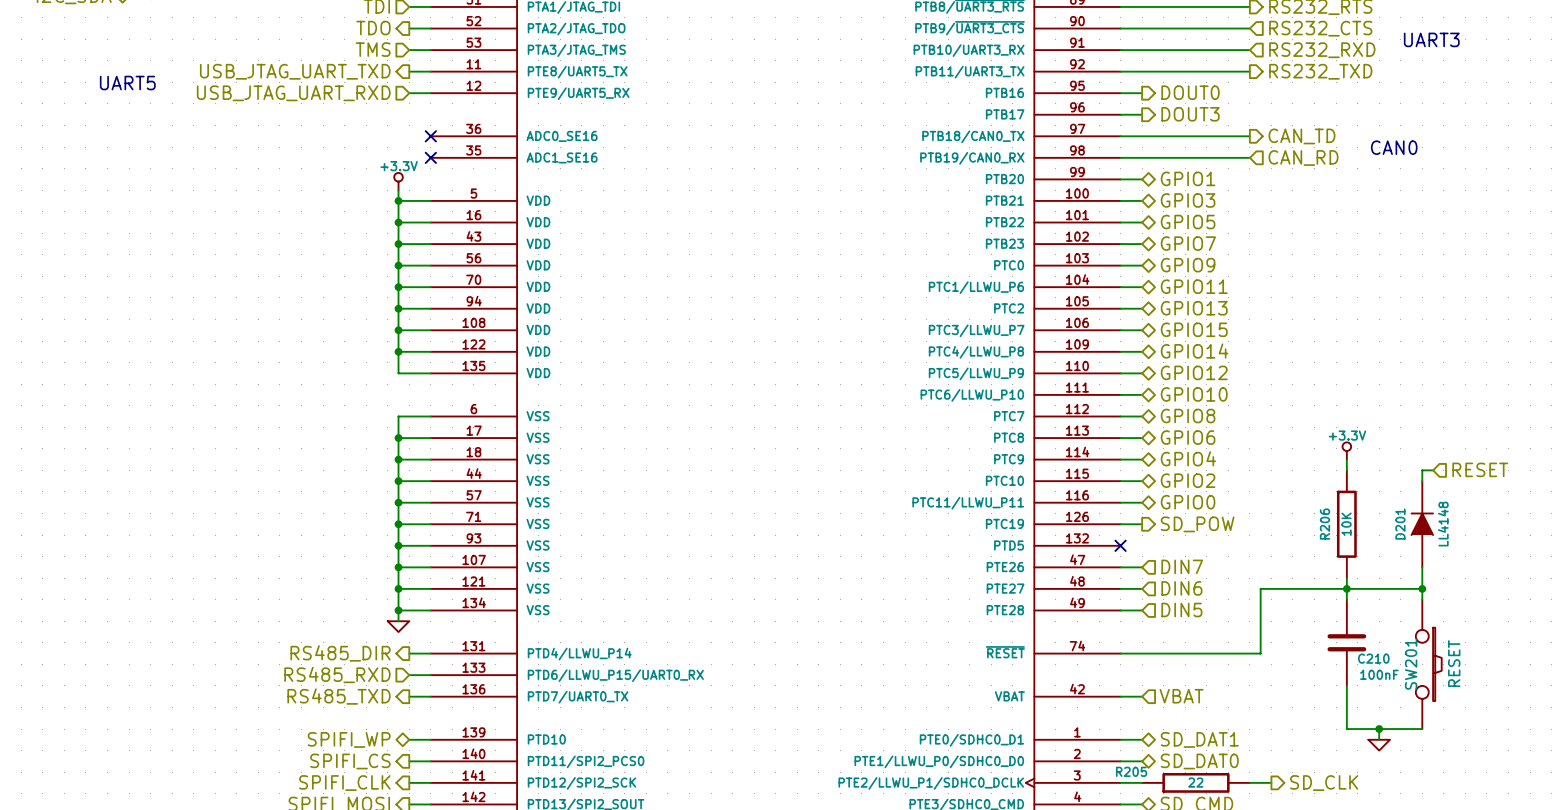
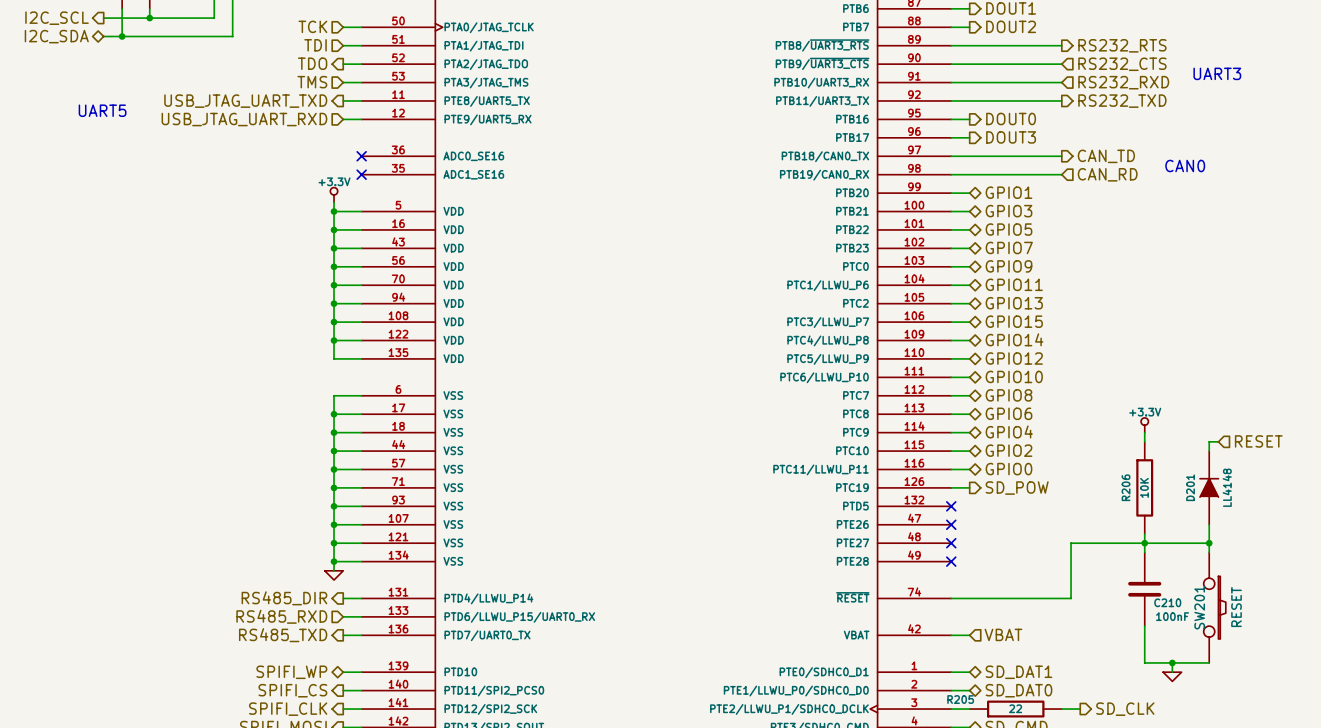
hierarchical label: DIN7 (1182, 566) -> none
wire: (1120, 567) (1142, 567) -> none
no-connect mark: none -> (951, 524)
wire: (1120, 588) (1142, 588) -> none
no-connect mark: none -> (951, 543)
hierarchical label: DIN6 (1181, 588) -> none
hierarchical label: DIN5 (1181, 609) -> none
wire: (1120, 610) (1142, 610) -> none
no-connect mark: none -> (951, 561)

